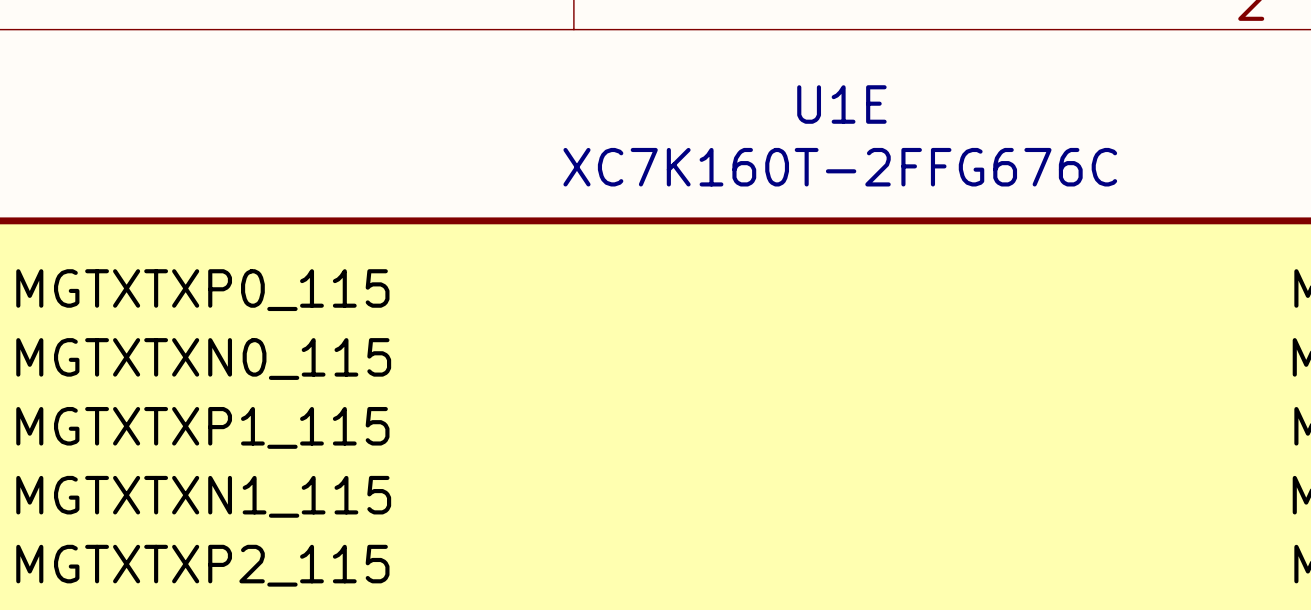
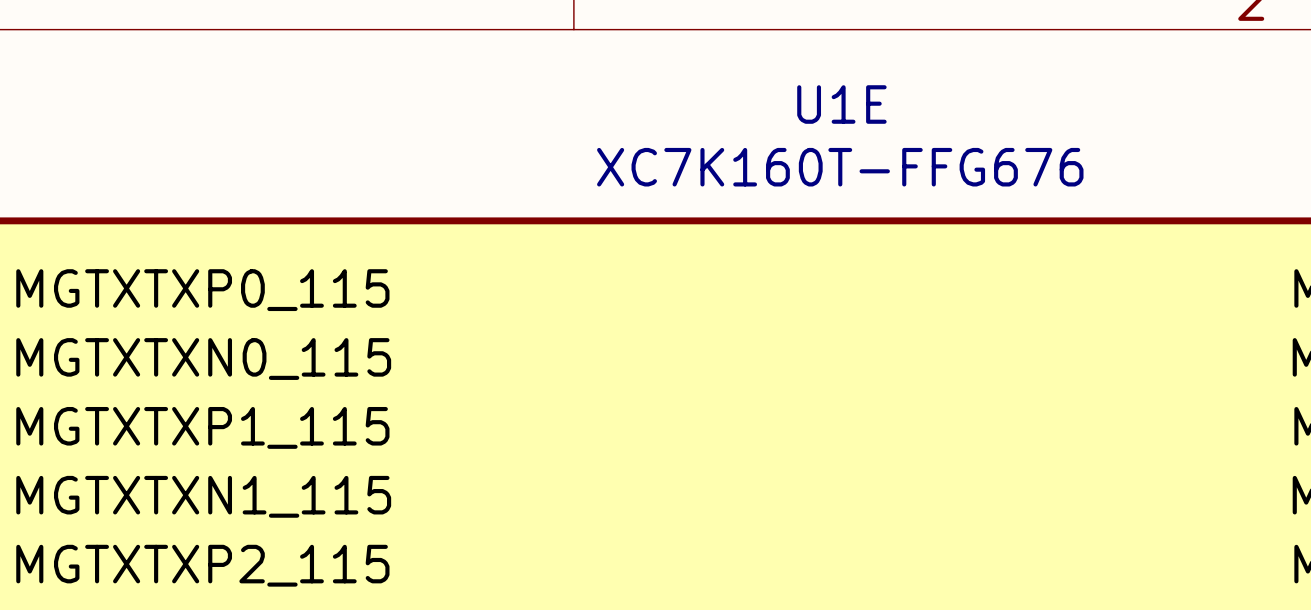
U1E value: XC7K160T-2FFG676C (840, 167) -> XC7K160T-FFG676 (840, 167)

